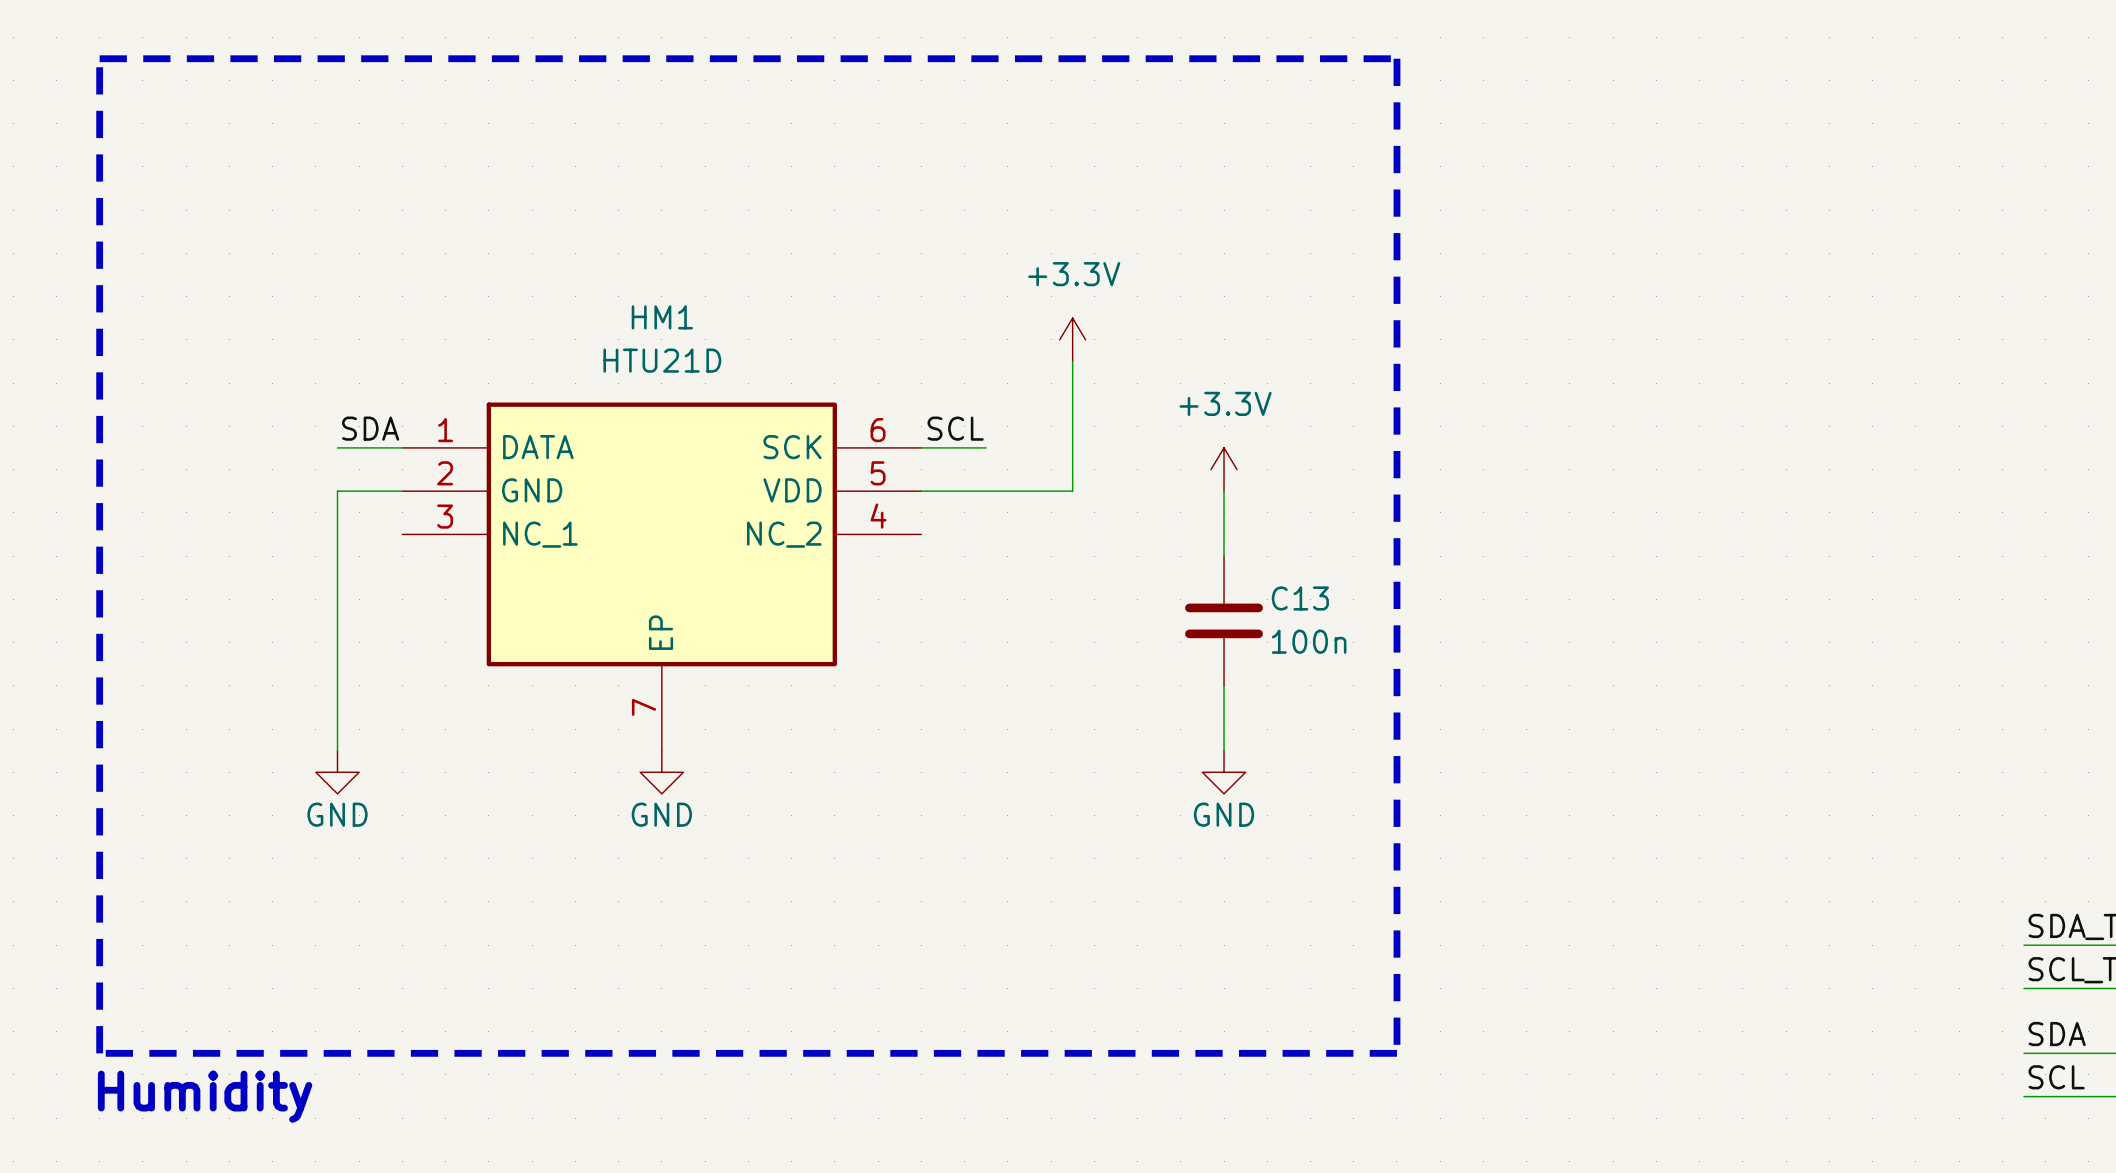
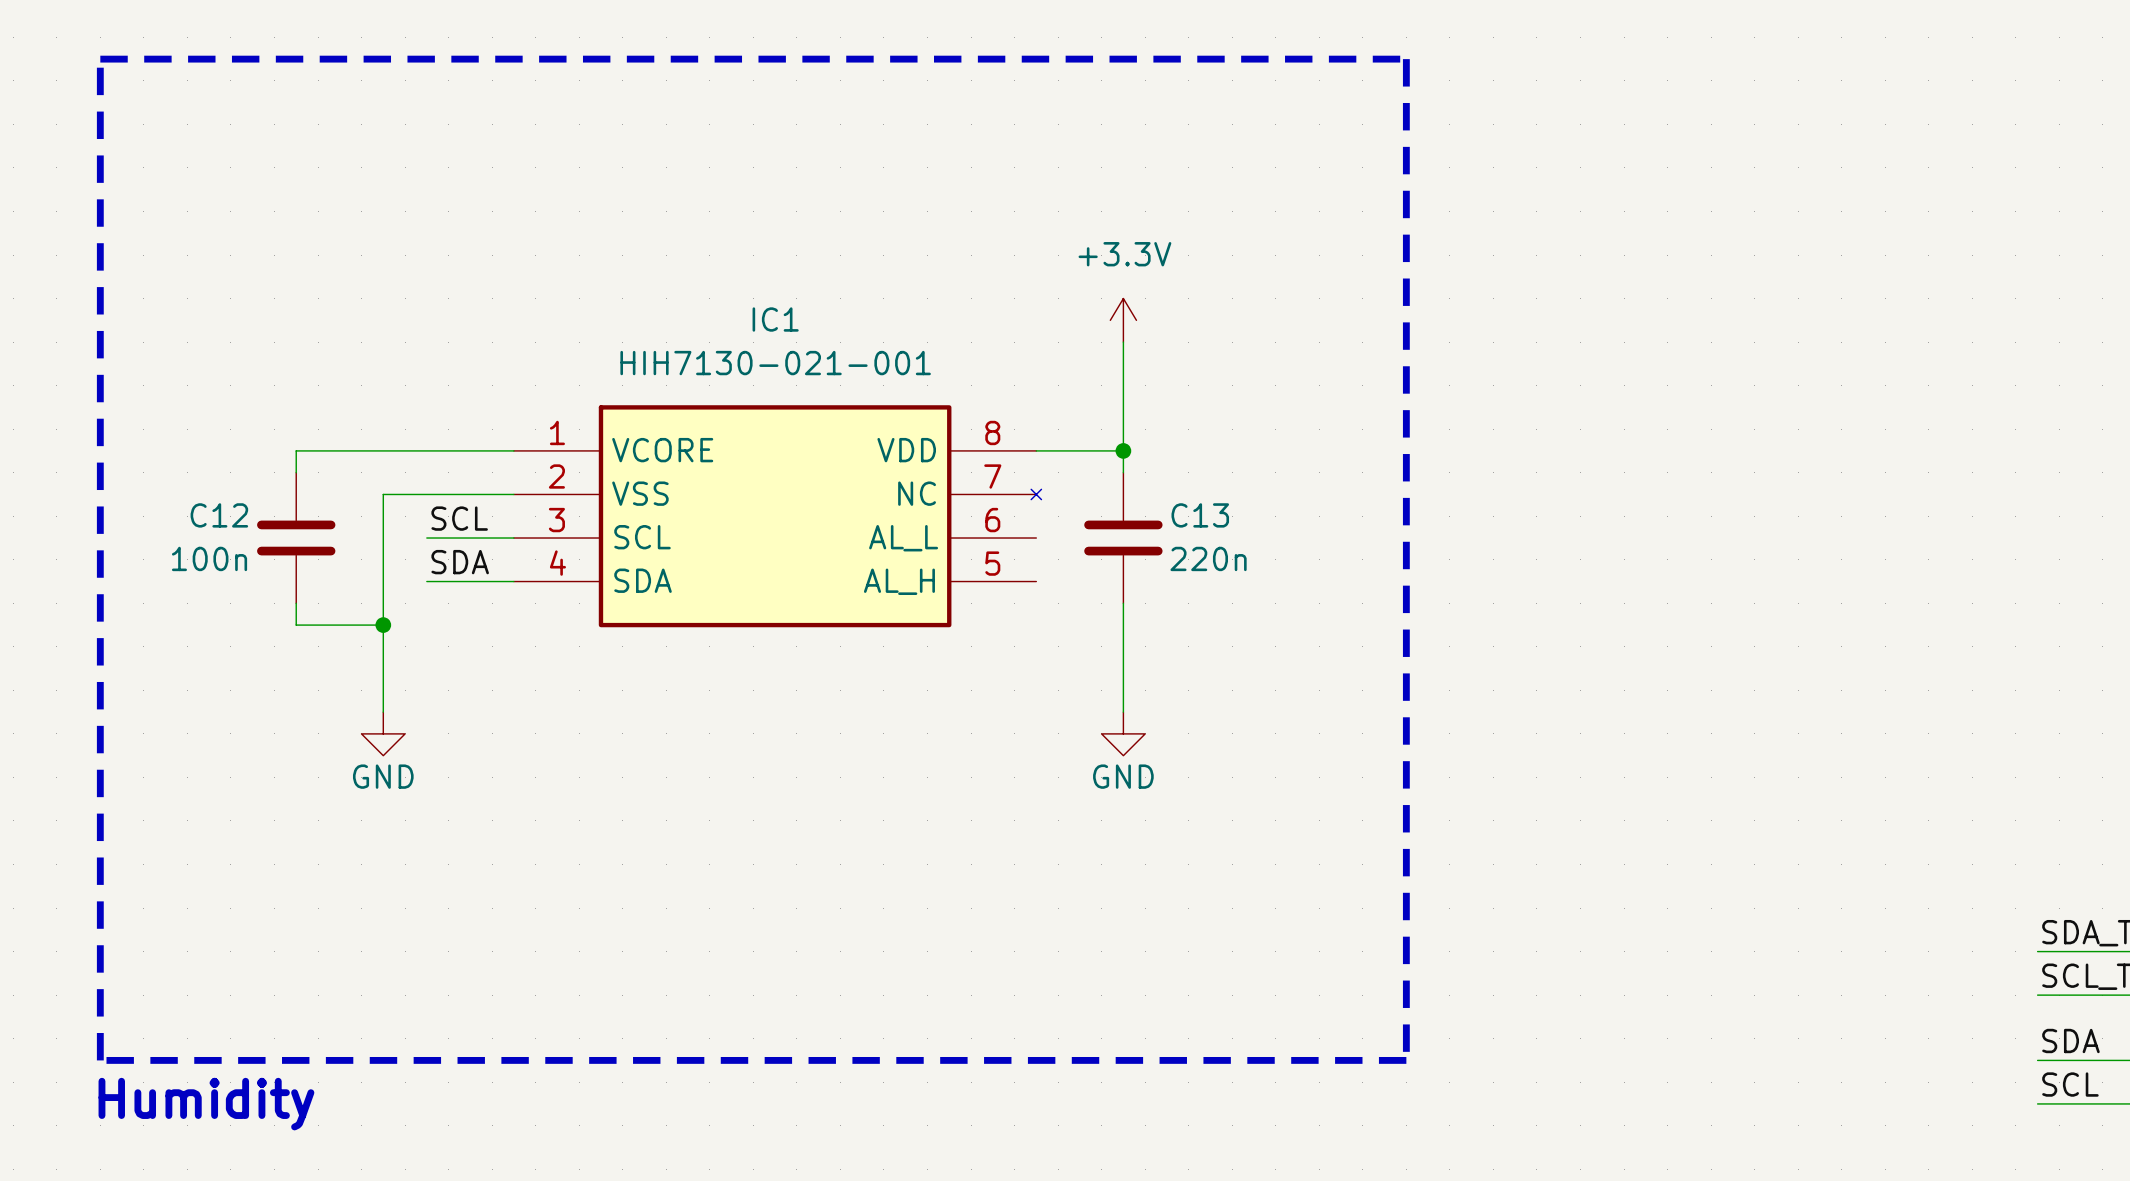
power symbol position: +3.3V (1072, 339) -> +3.3V (1123, 320)
wire: none -> (1123, 342) (1123, 472)
wire: (1072, 361) (1072, 491) (921, 491) -> none
label position: SDA (370, 428) -> SDA (460, 562)
label: SCL (955, 428) -> none
wire: none -> (339, 450) (296, 450) (296, 472)
wire: none -> (1036, 450) (1123, 450)
junction: none -> (1123, 450)
power symbol: +3.3V (1224, 469) -> none
wire: (380, 491) (337, 491) (337, 750) -> (383, 494) (383, 712)
wire: (1224, 491) (1224, 556) -> none
IC1: none -> HIH7130-021-001 (777, 516)
label: none -> SCL (459, 518)
C12: none -> 100n (296, 538)
HM1: HTU21D (661, 576) -> none
wire: none -> (426, 581) (513, 581)
wire: none -> (296, 603) (296, 625) (383, 625)
wire: none -> (1123, 603) (1123, 712)
junction: none -> (383, 625)
C13 position: (1224, 620) -> (1123, 538)
C13 value: 100n (1309, 641) -> 220n (1208, 558)
wire: (1224, 685) (1224, 750) -> none
power symbol position: GND (337, 772) -> GND (383, 733)
power symbol: GND (661, 772) -> none
power symbol position: GND (1224, 772) -> GND (1123, 733)

